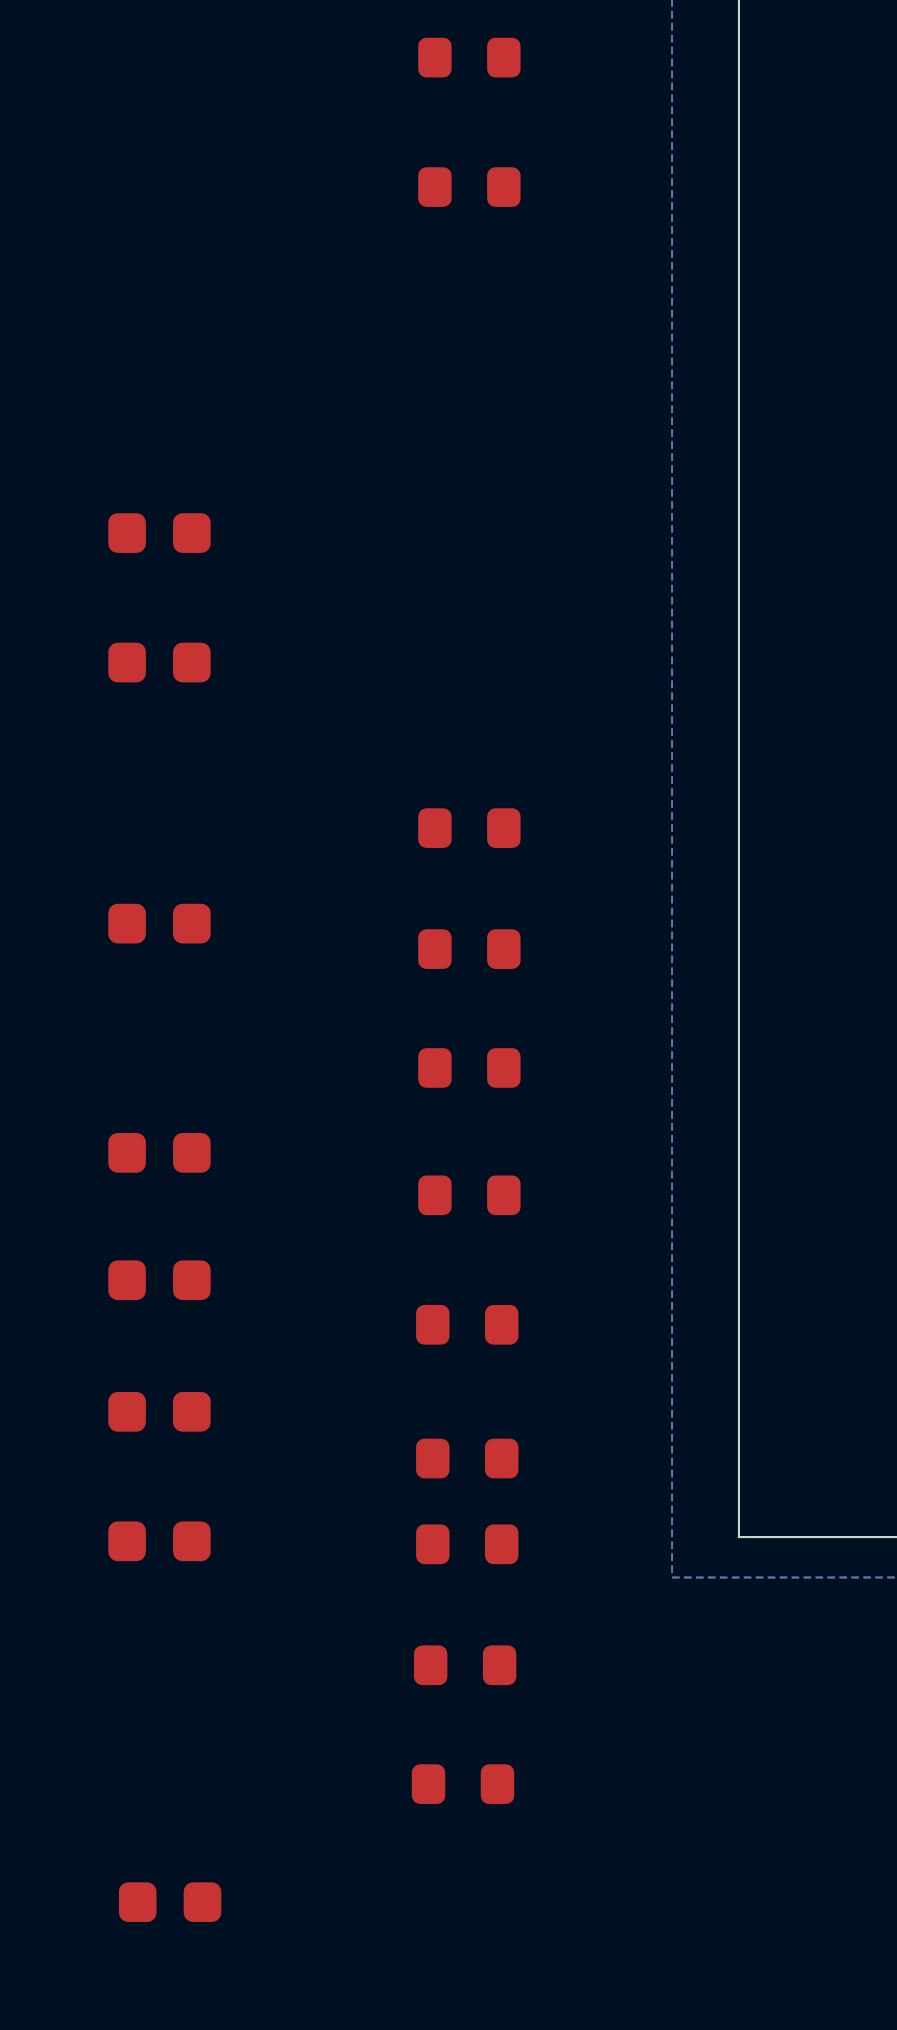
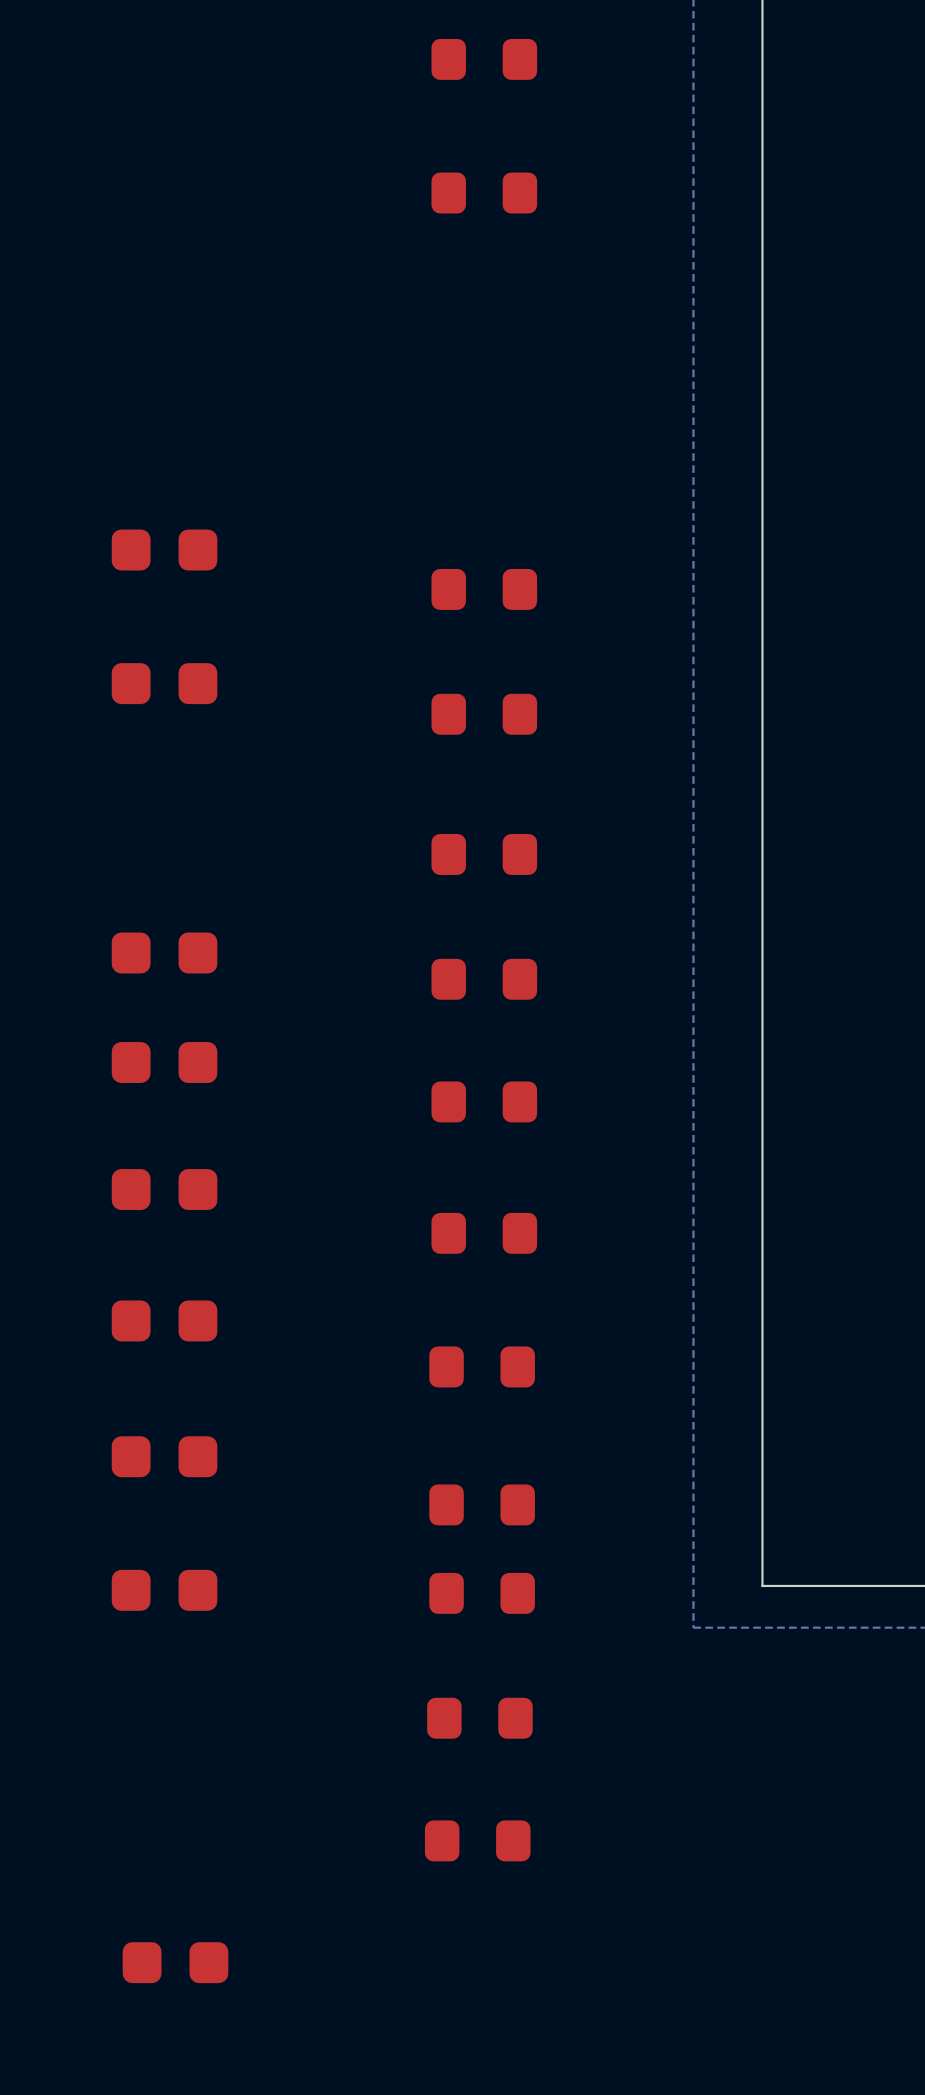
part: none -> (484, 589)
part: none -> (484, 714)
part: none -> (164, 1062)

